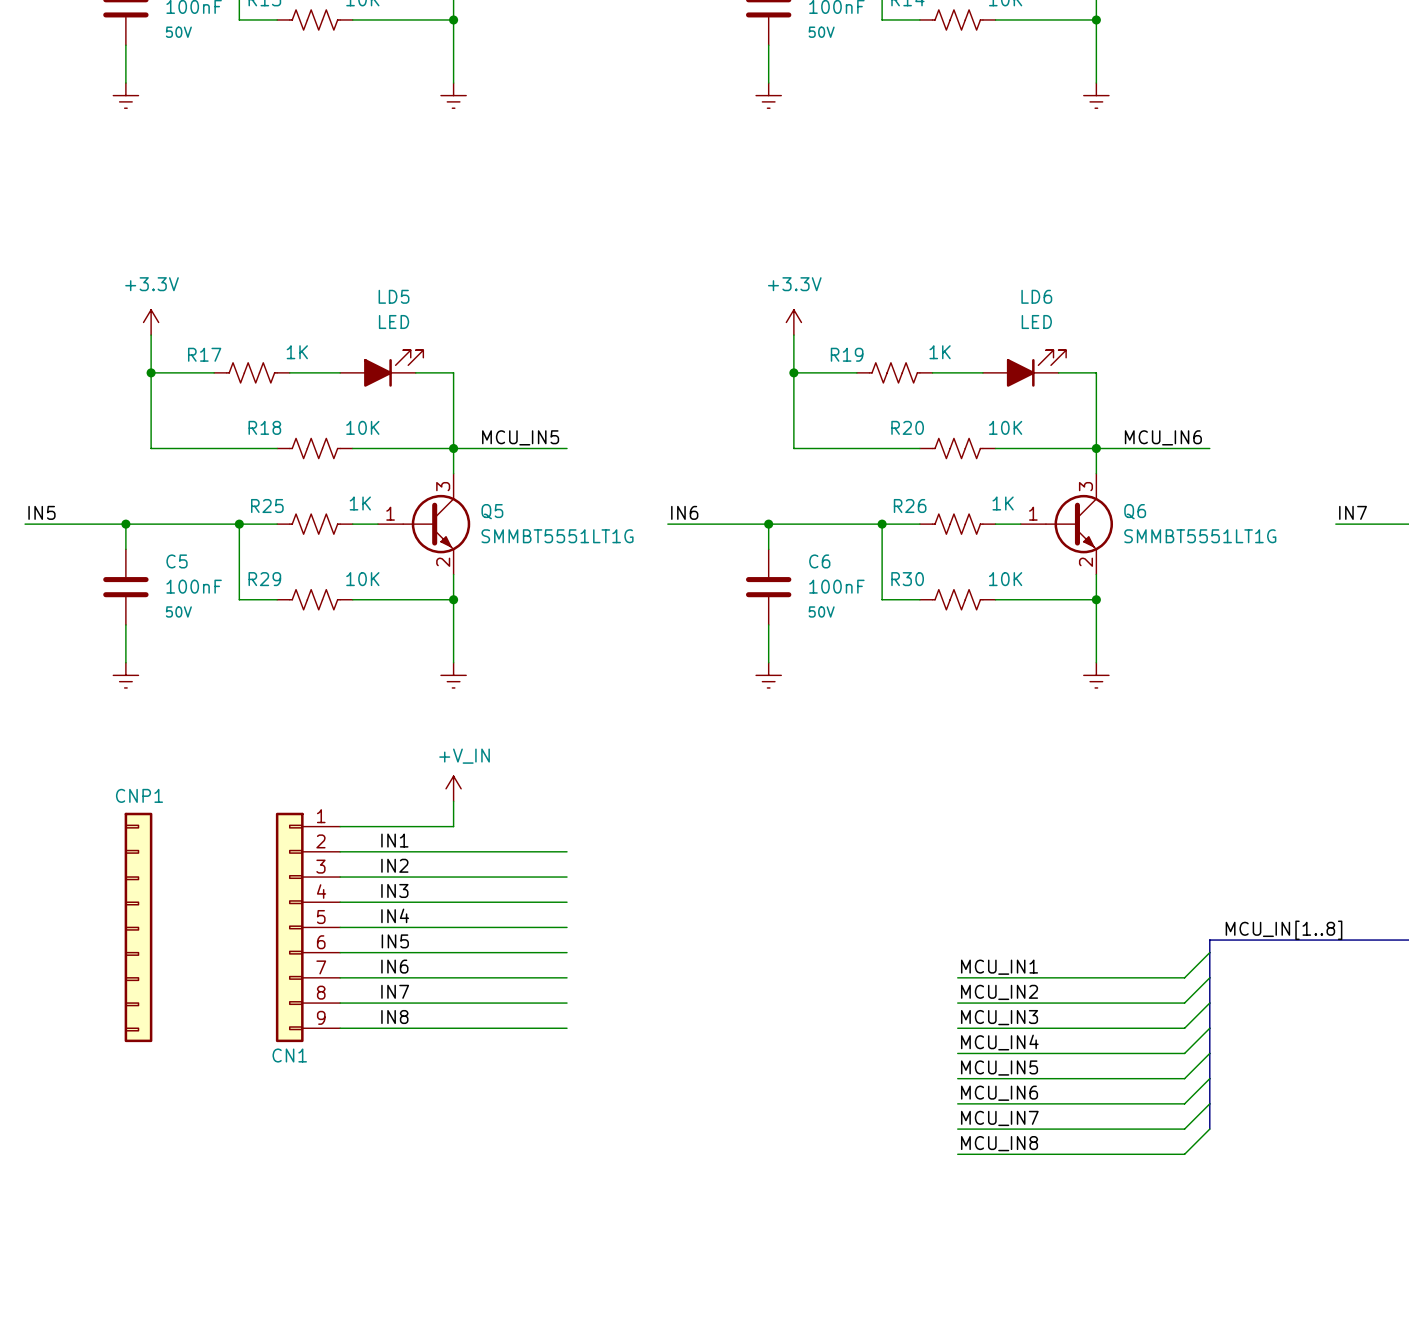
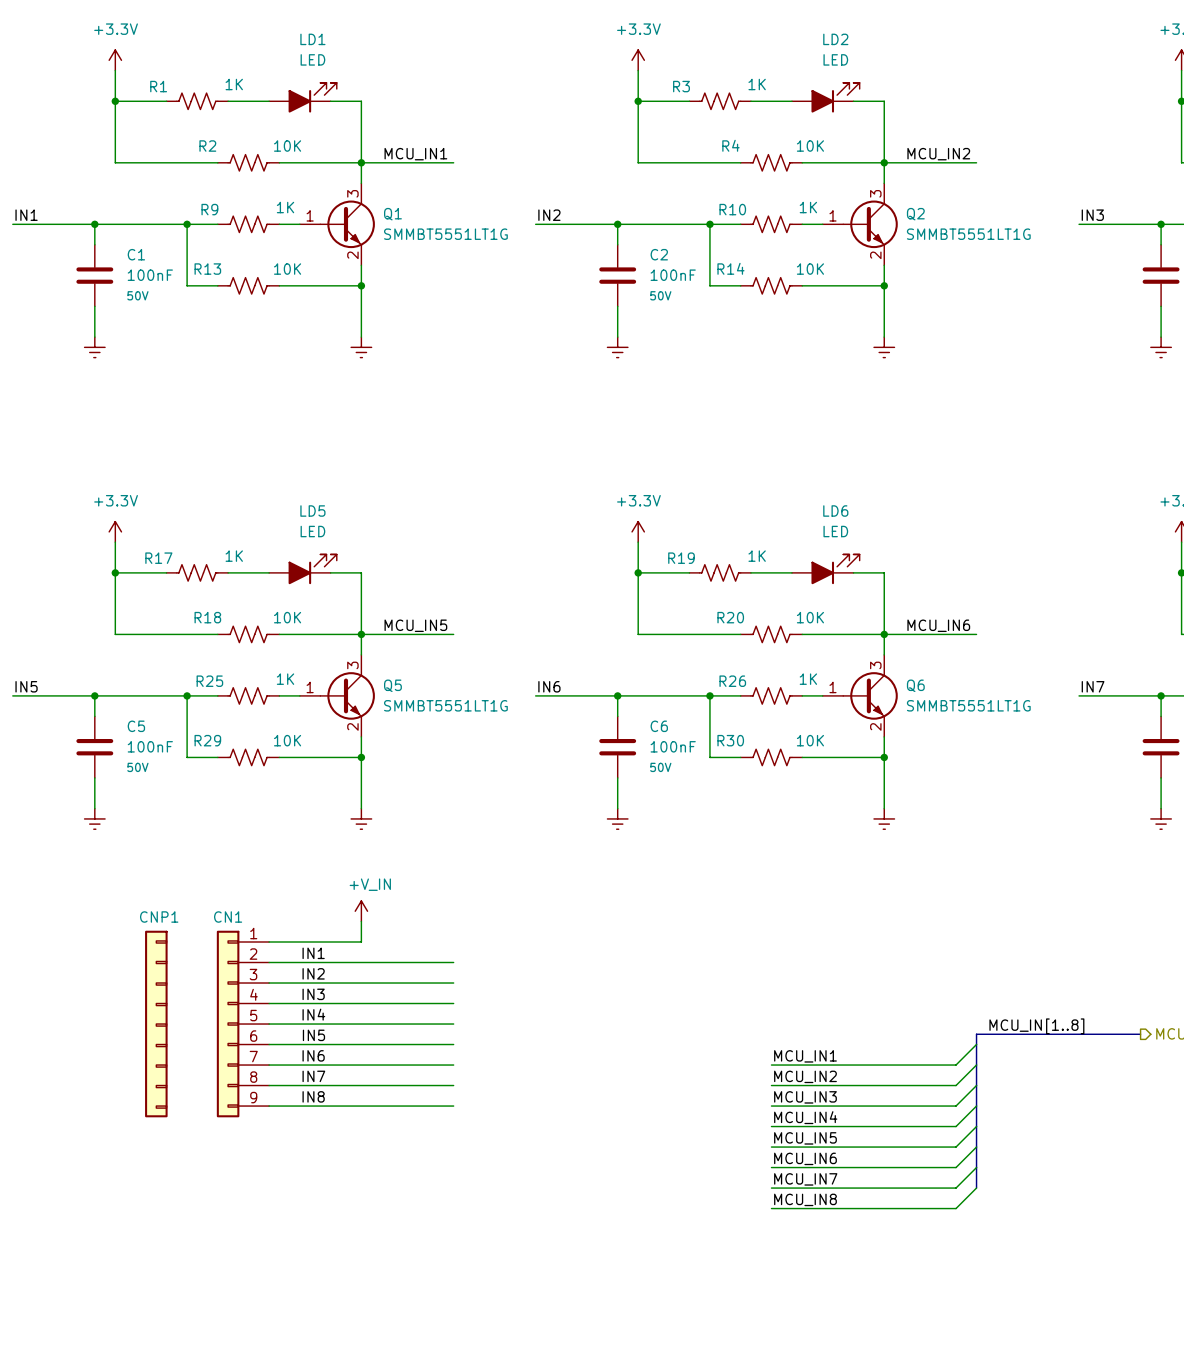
CNP1 flip: as is (138, 927) -> left-right (156, 1024)
CN1 name position: CN1 (289, 1055) -> CN1 (228, 917)

